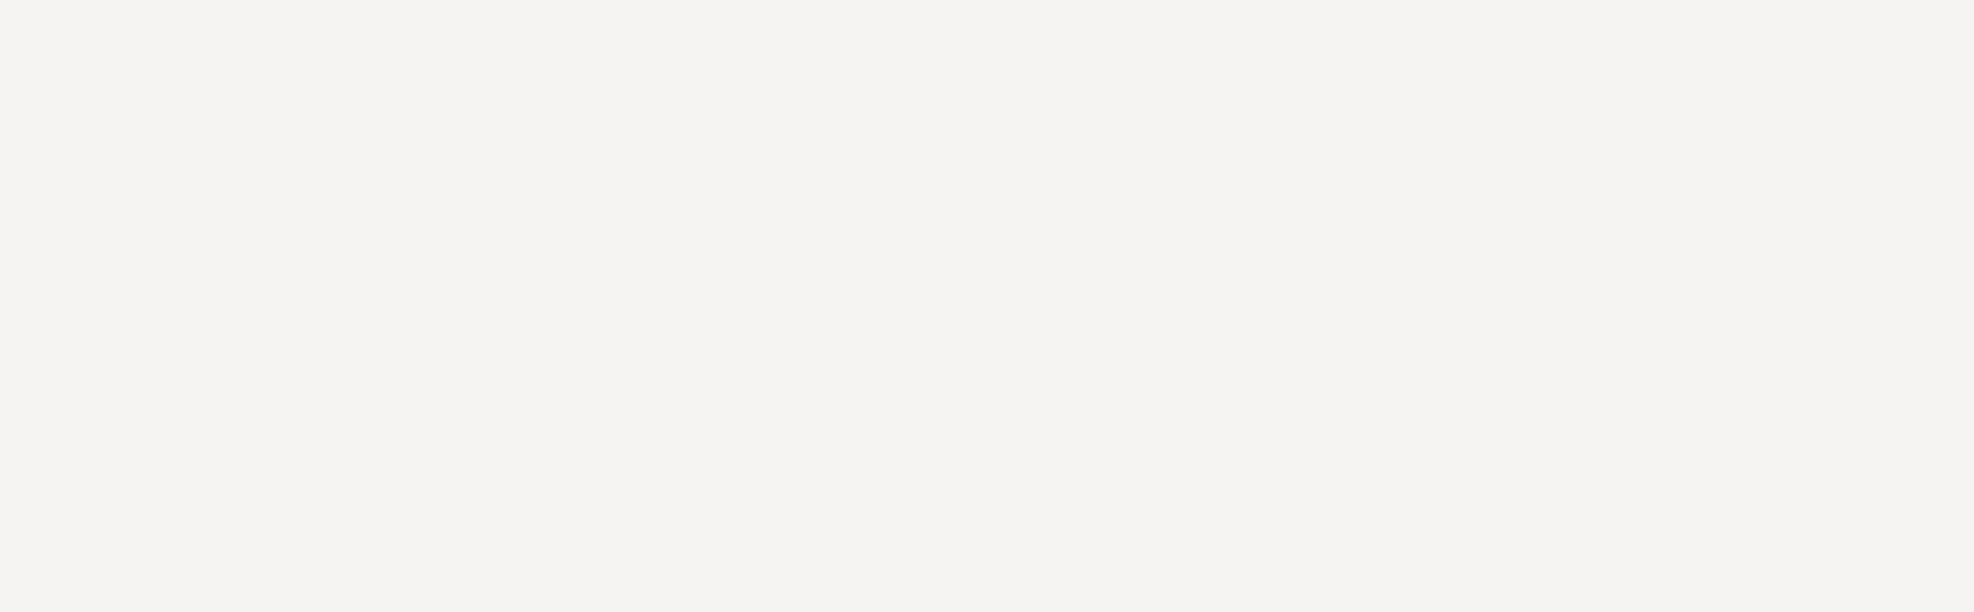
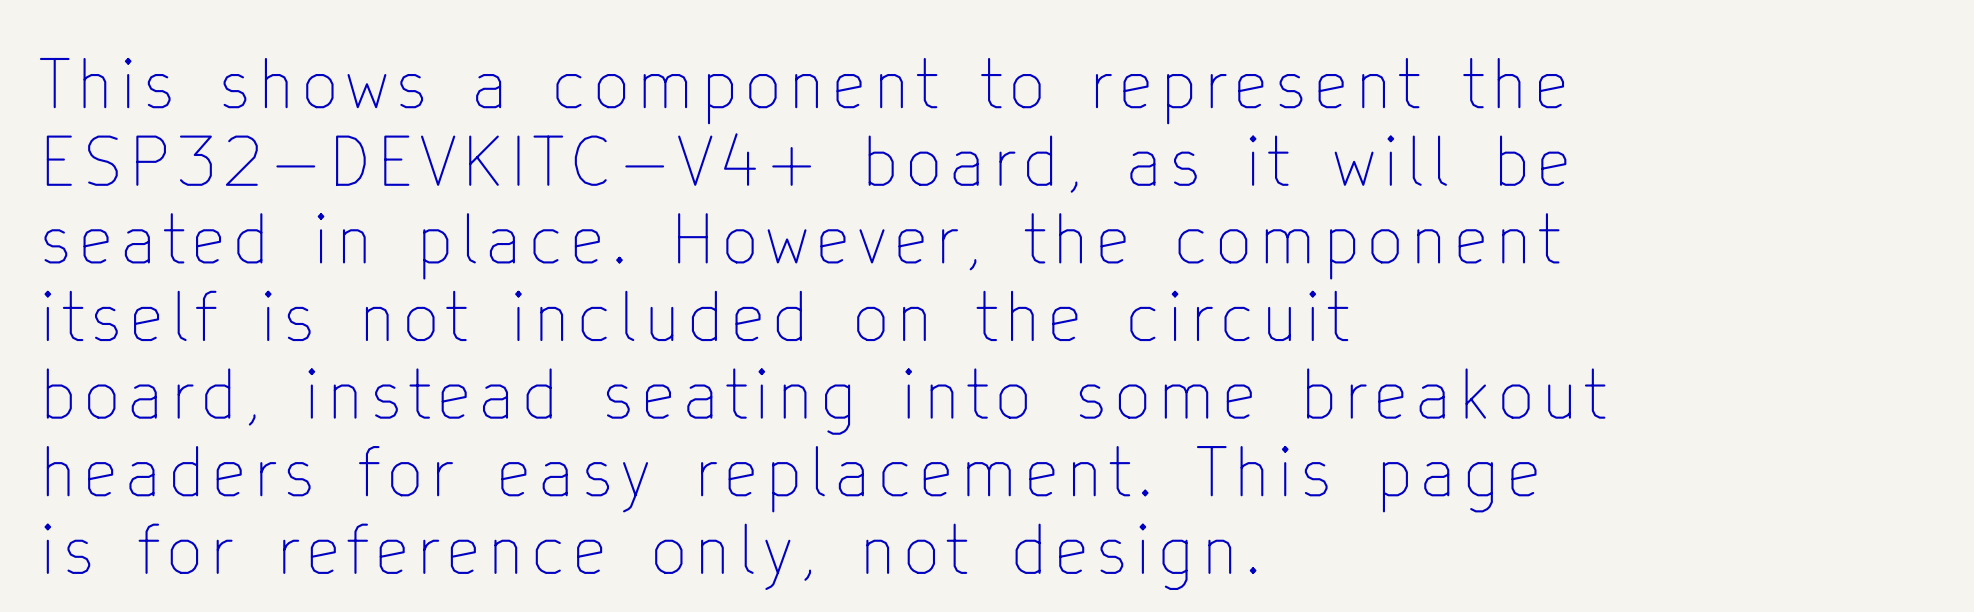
text: none -> This shows a component to represent the (801, 91)
text: none -> ESP32-DEVKITC-V4+ board, as it will be (806, 162)
text: none -> seated in place. However, the component (801, 246)
text: none -> itself is not included on the circuit (696, 315)
text: none -> board, instead seating into some breakout (826, 401)
text: none -> headers for easy replacement. This page (791, 479)
text: none -> is for reference only, not design. (650, 556)

